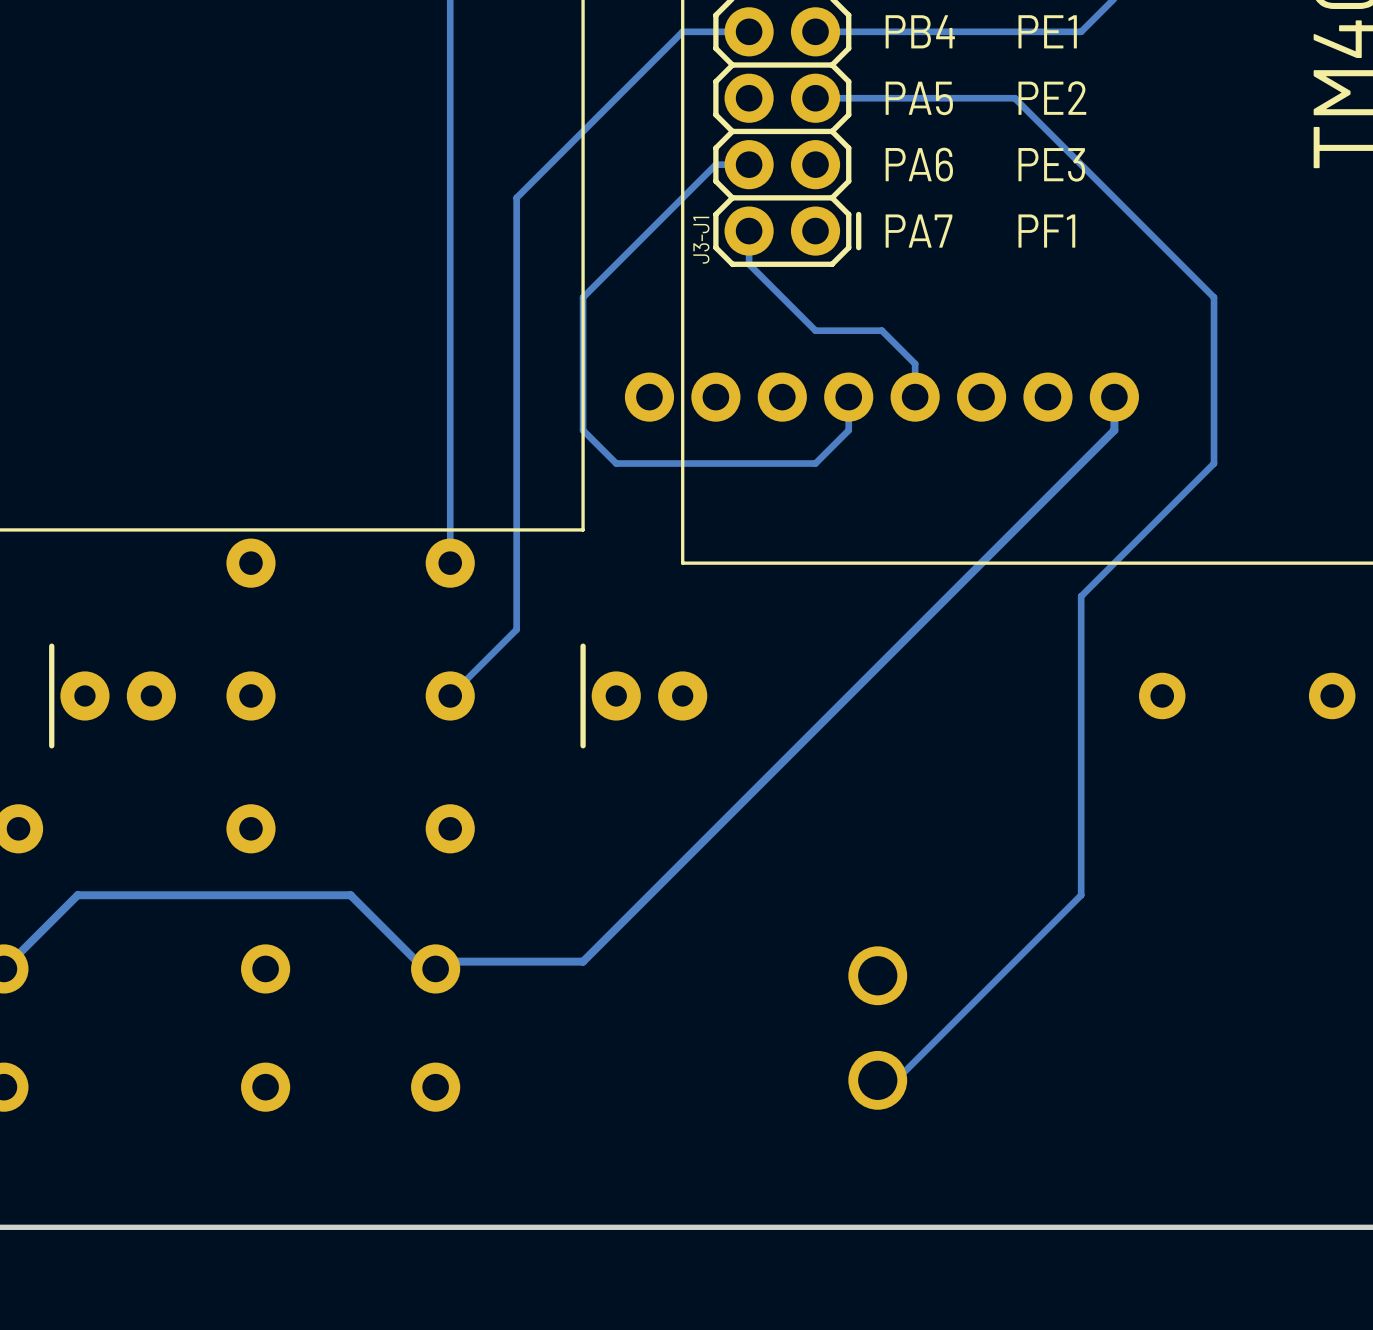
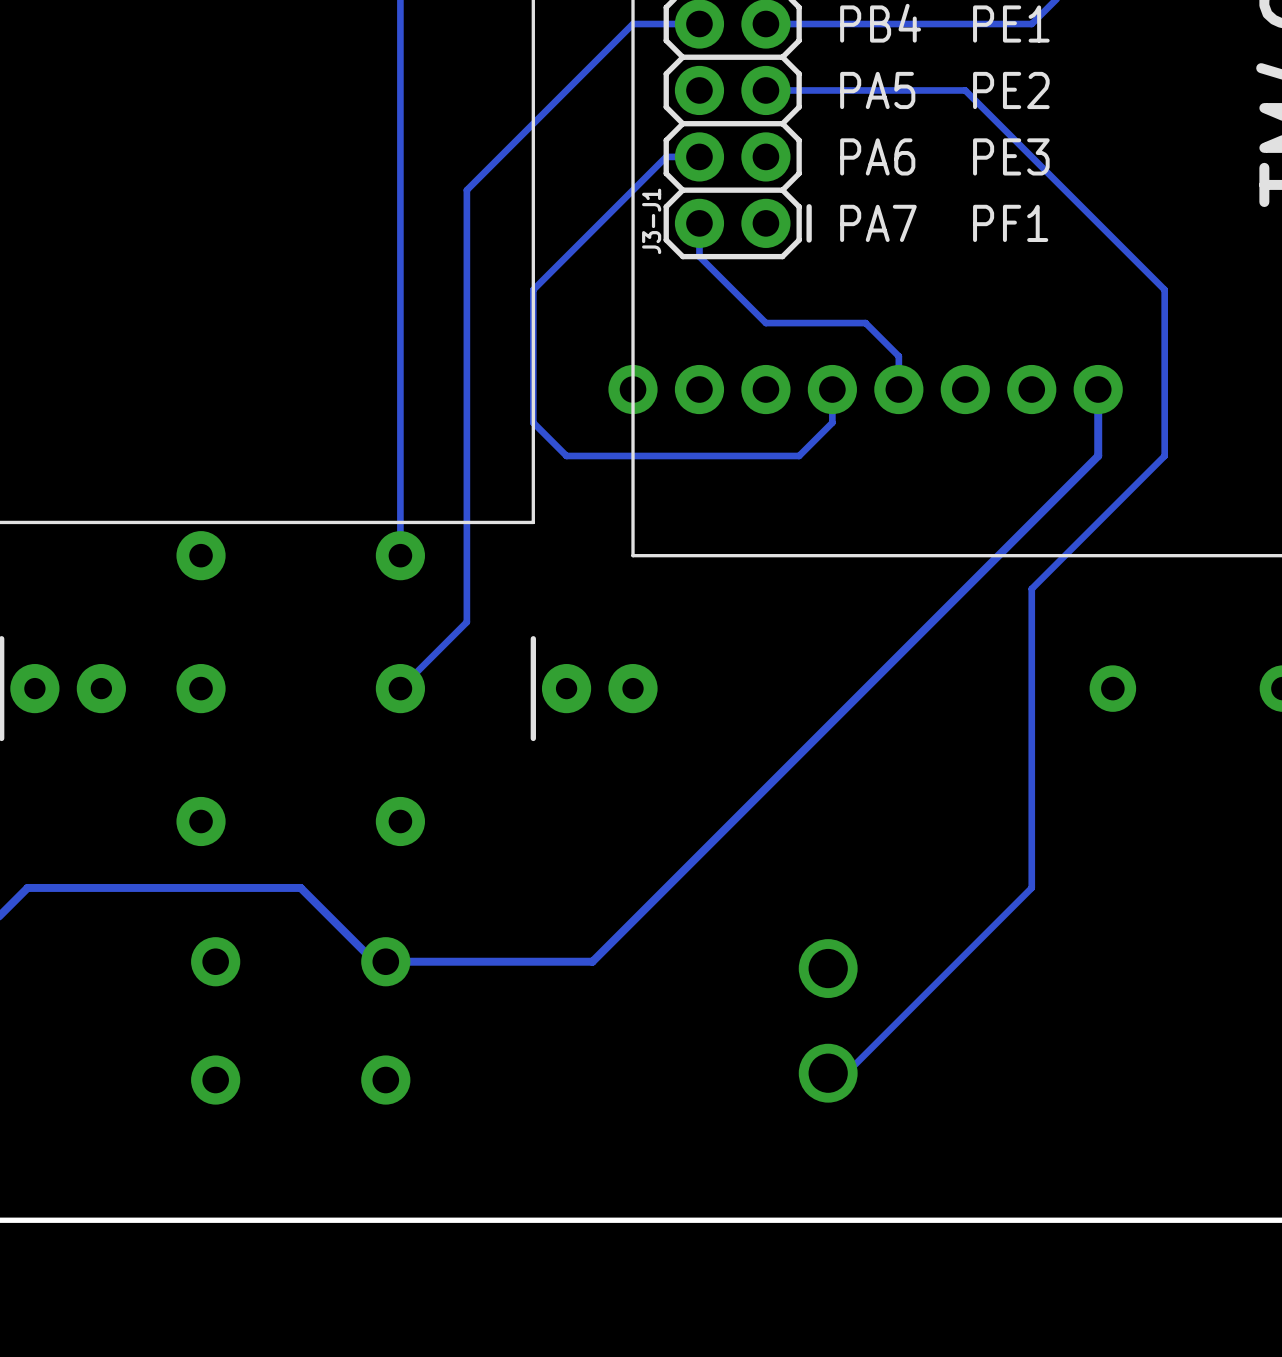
track: (881, 330) (915, 363) (915, 397) -> (832, 323) (865, 323) (898, 356) (898, 389)
track: (848, 397) (848, 430) (815, 463) -> (832, 389) (832, 422) (799, 455) (765, 455)
part position: (881, 397) -> (865, 389)
track: (1114, 397) (1114, 430) (583, 961) (442, 961) (435, 968) -> (1098, 389) (1098, 455) (592, 961) (385, 961)

